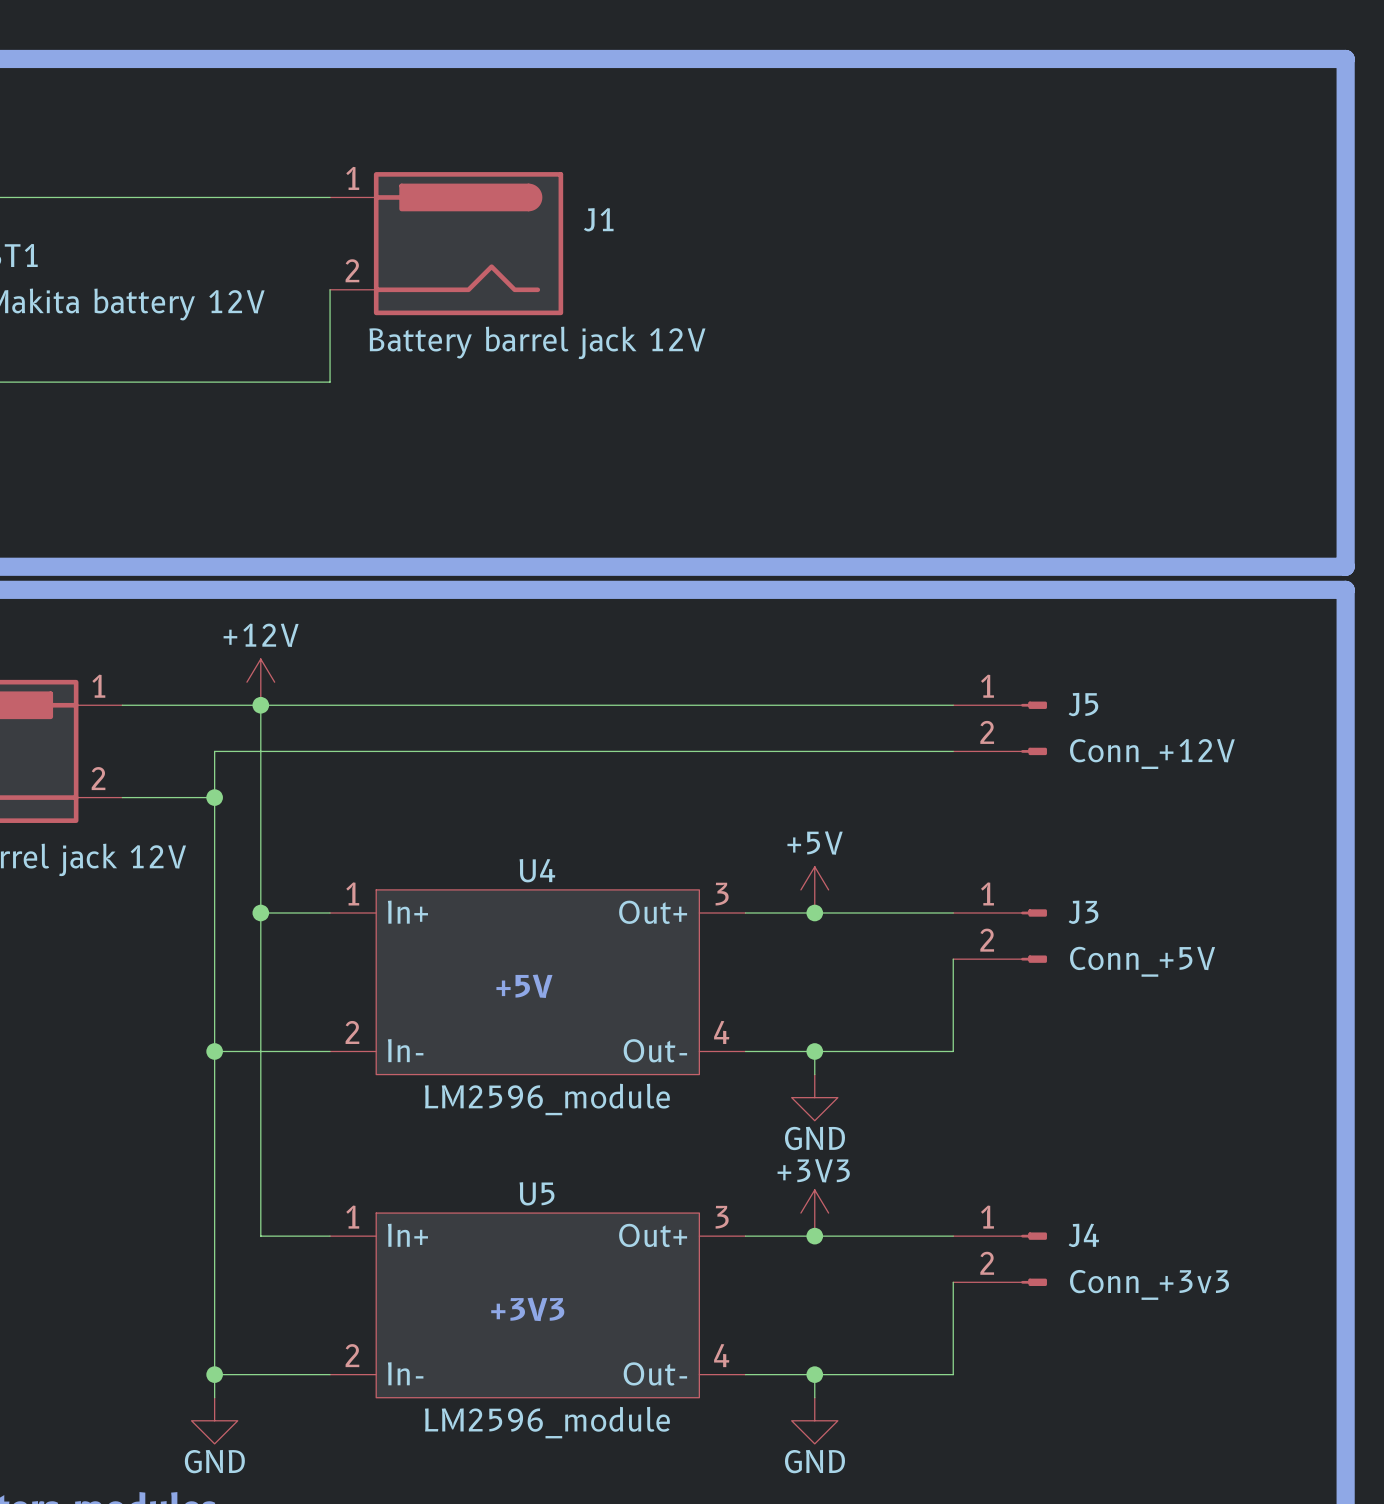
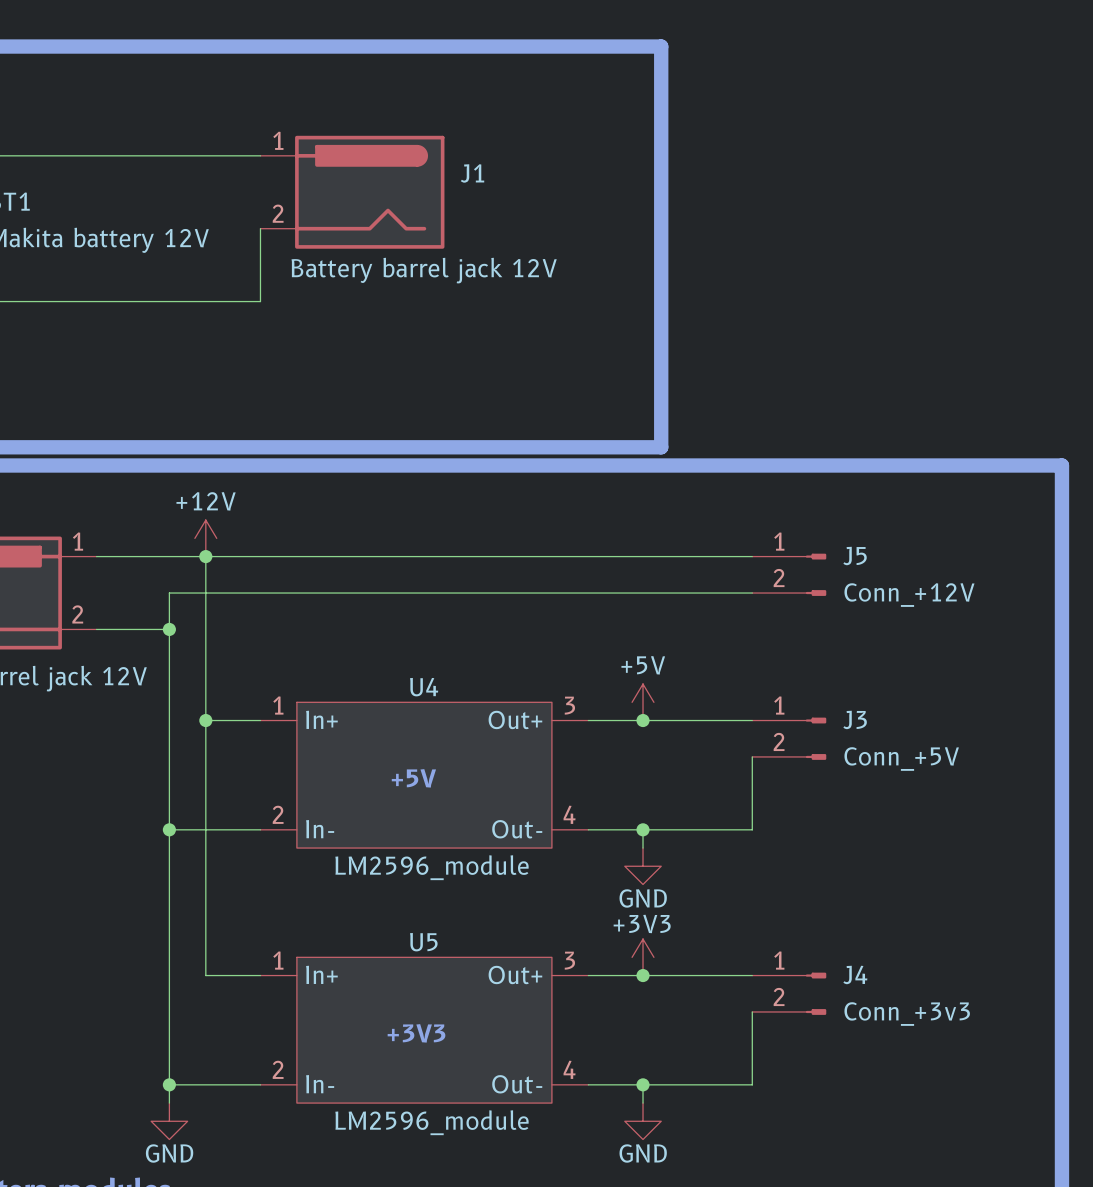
line: (837, 58) (1345, 58) (1345, 566) (837, 566) -> (661, 46) (661, 447)

